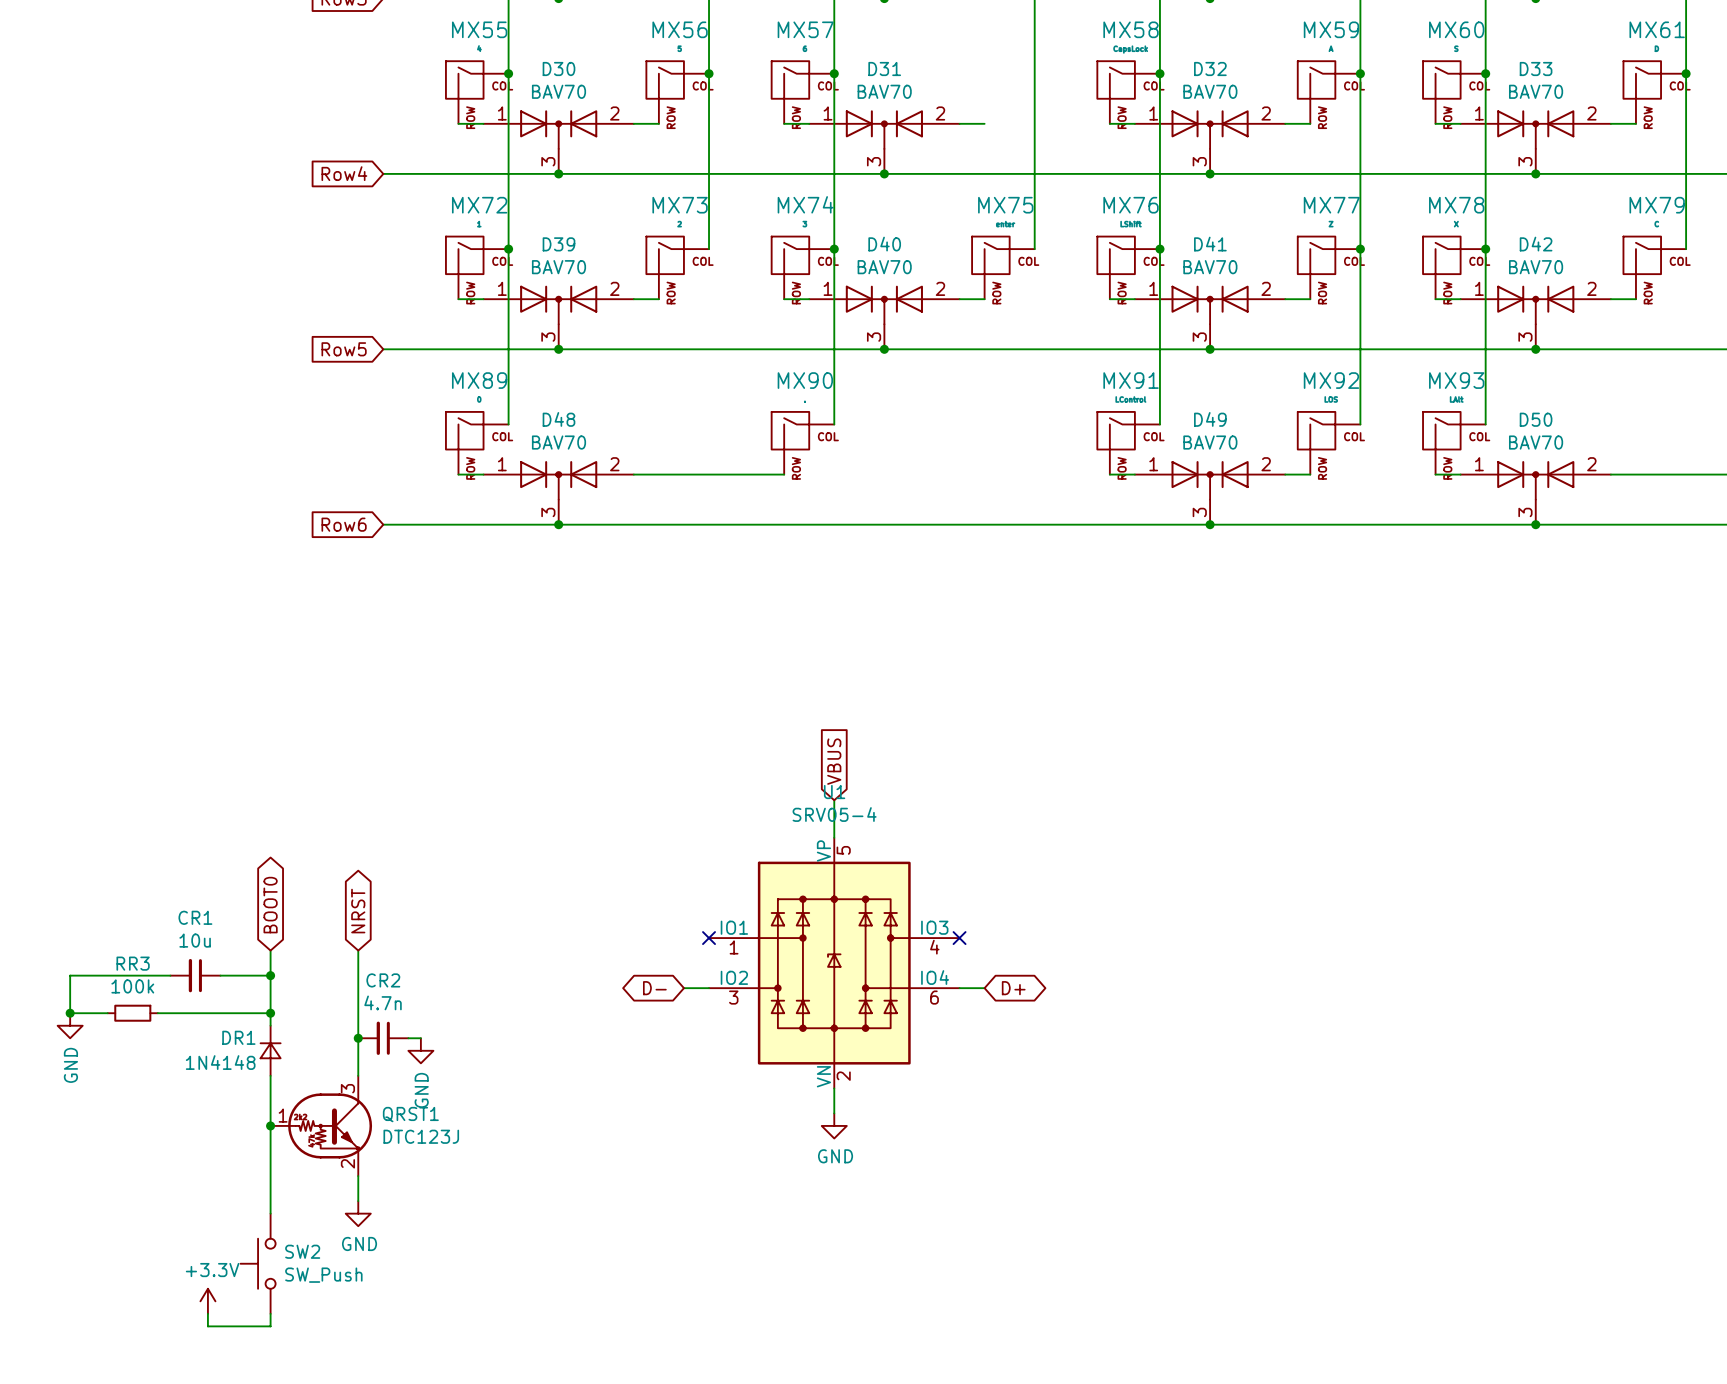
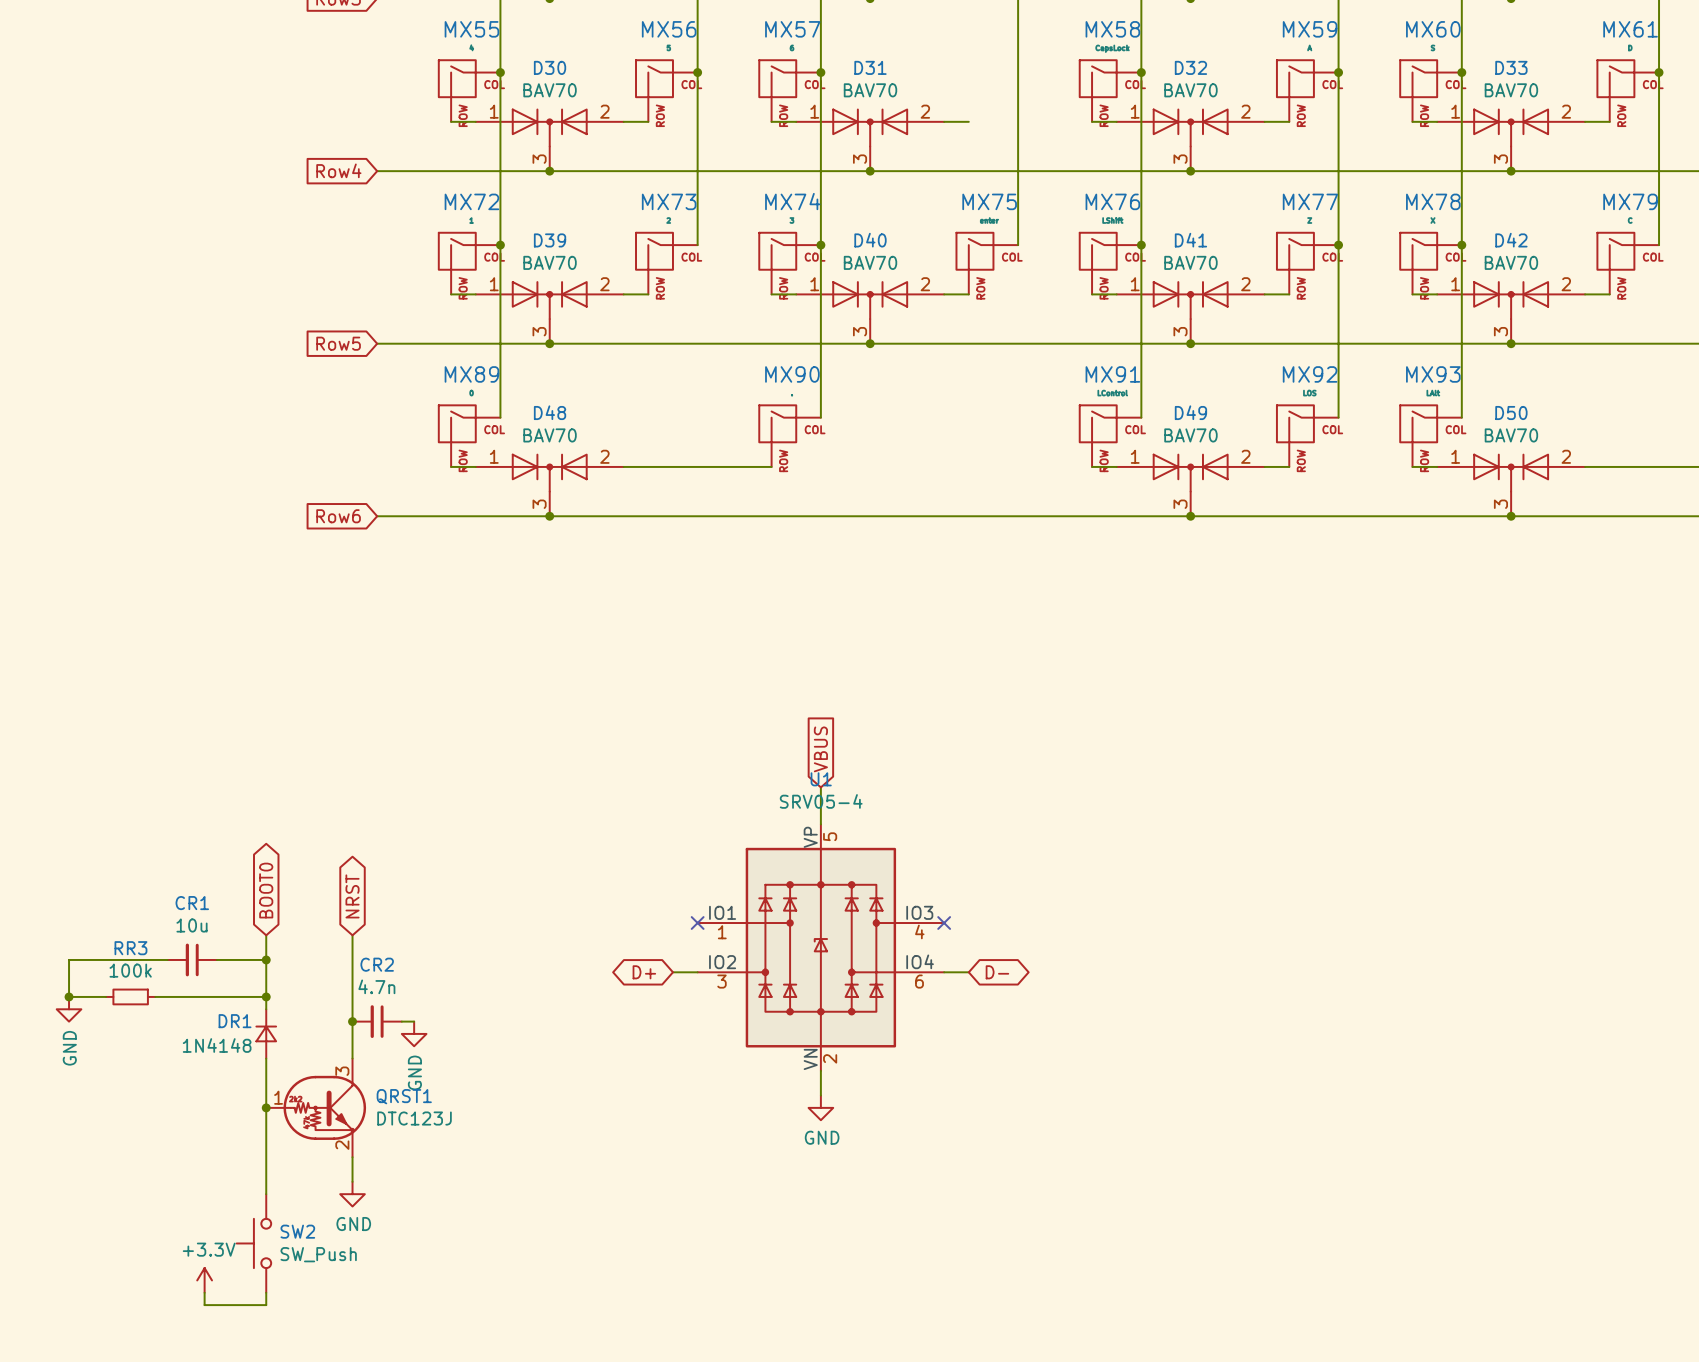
global label: D- (654, 988) -> D+ (644, 972)
global label: D+ (1013, 988) -> D- (997, 972)

